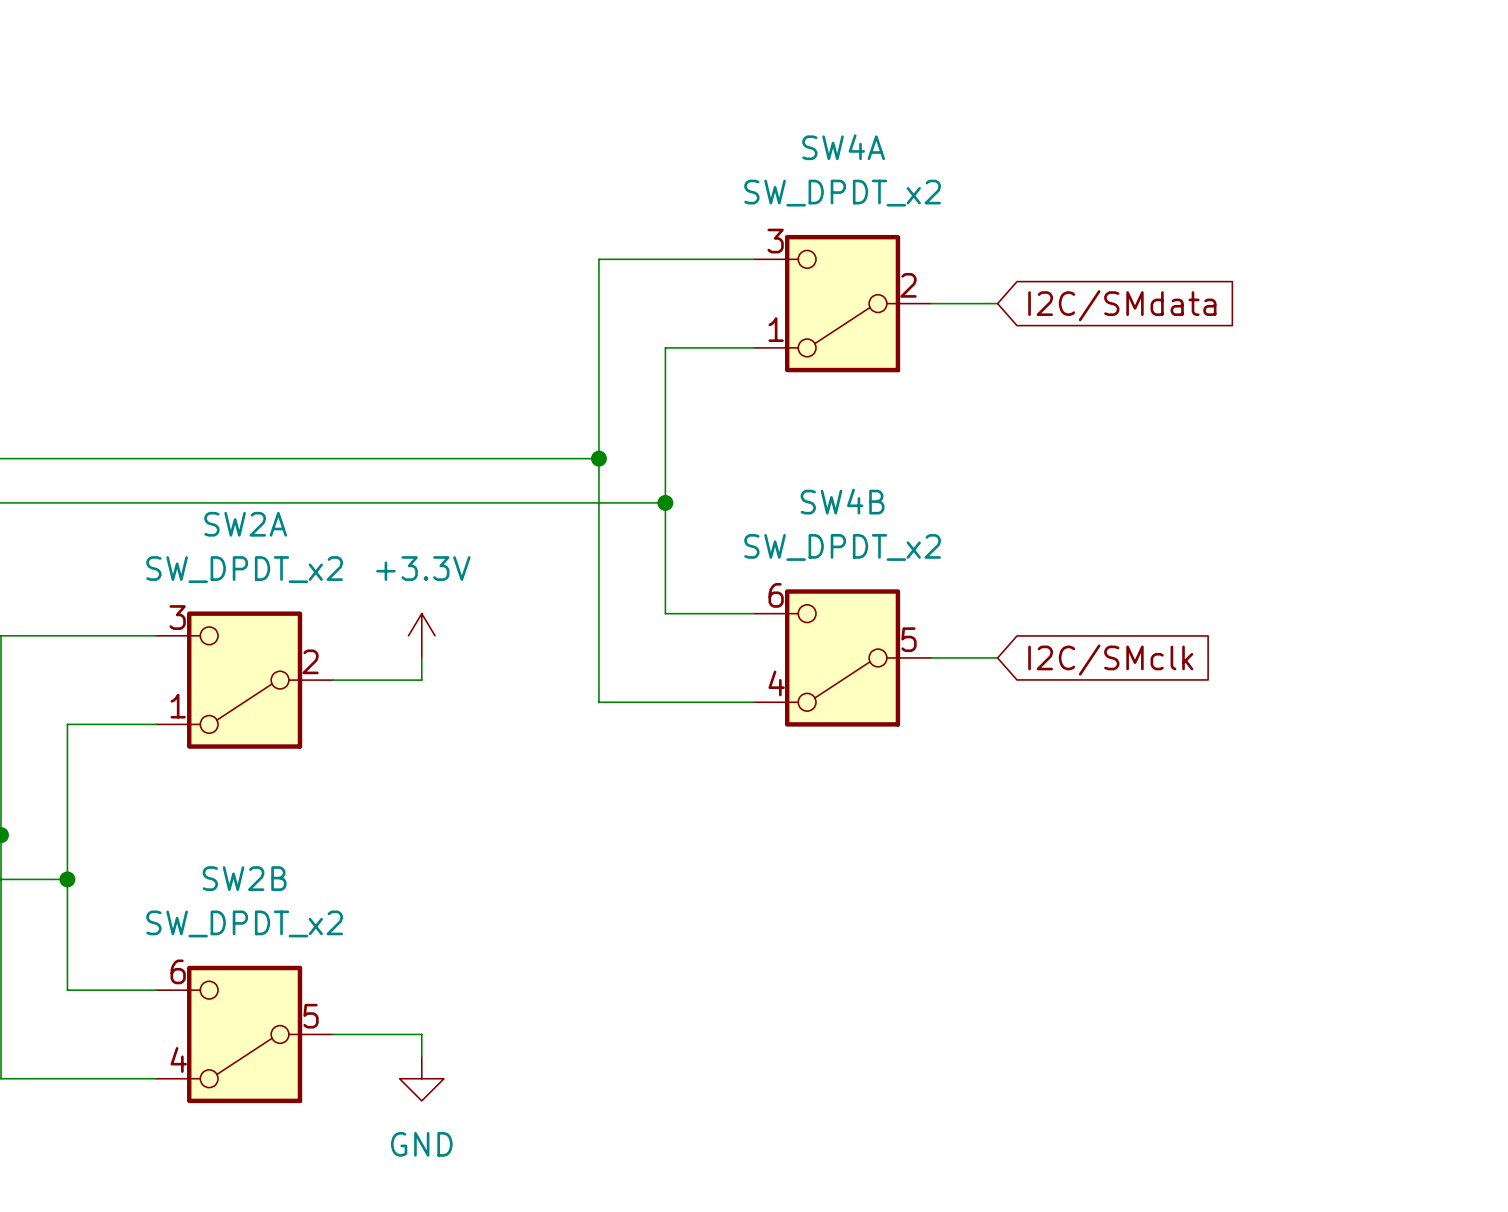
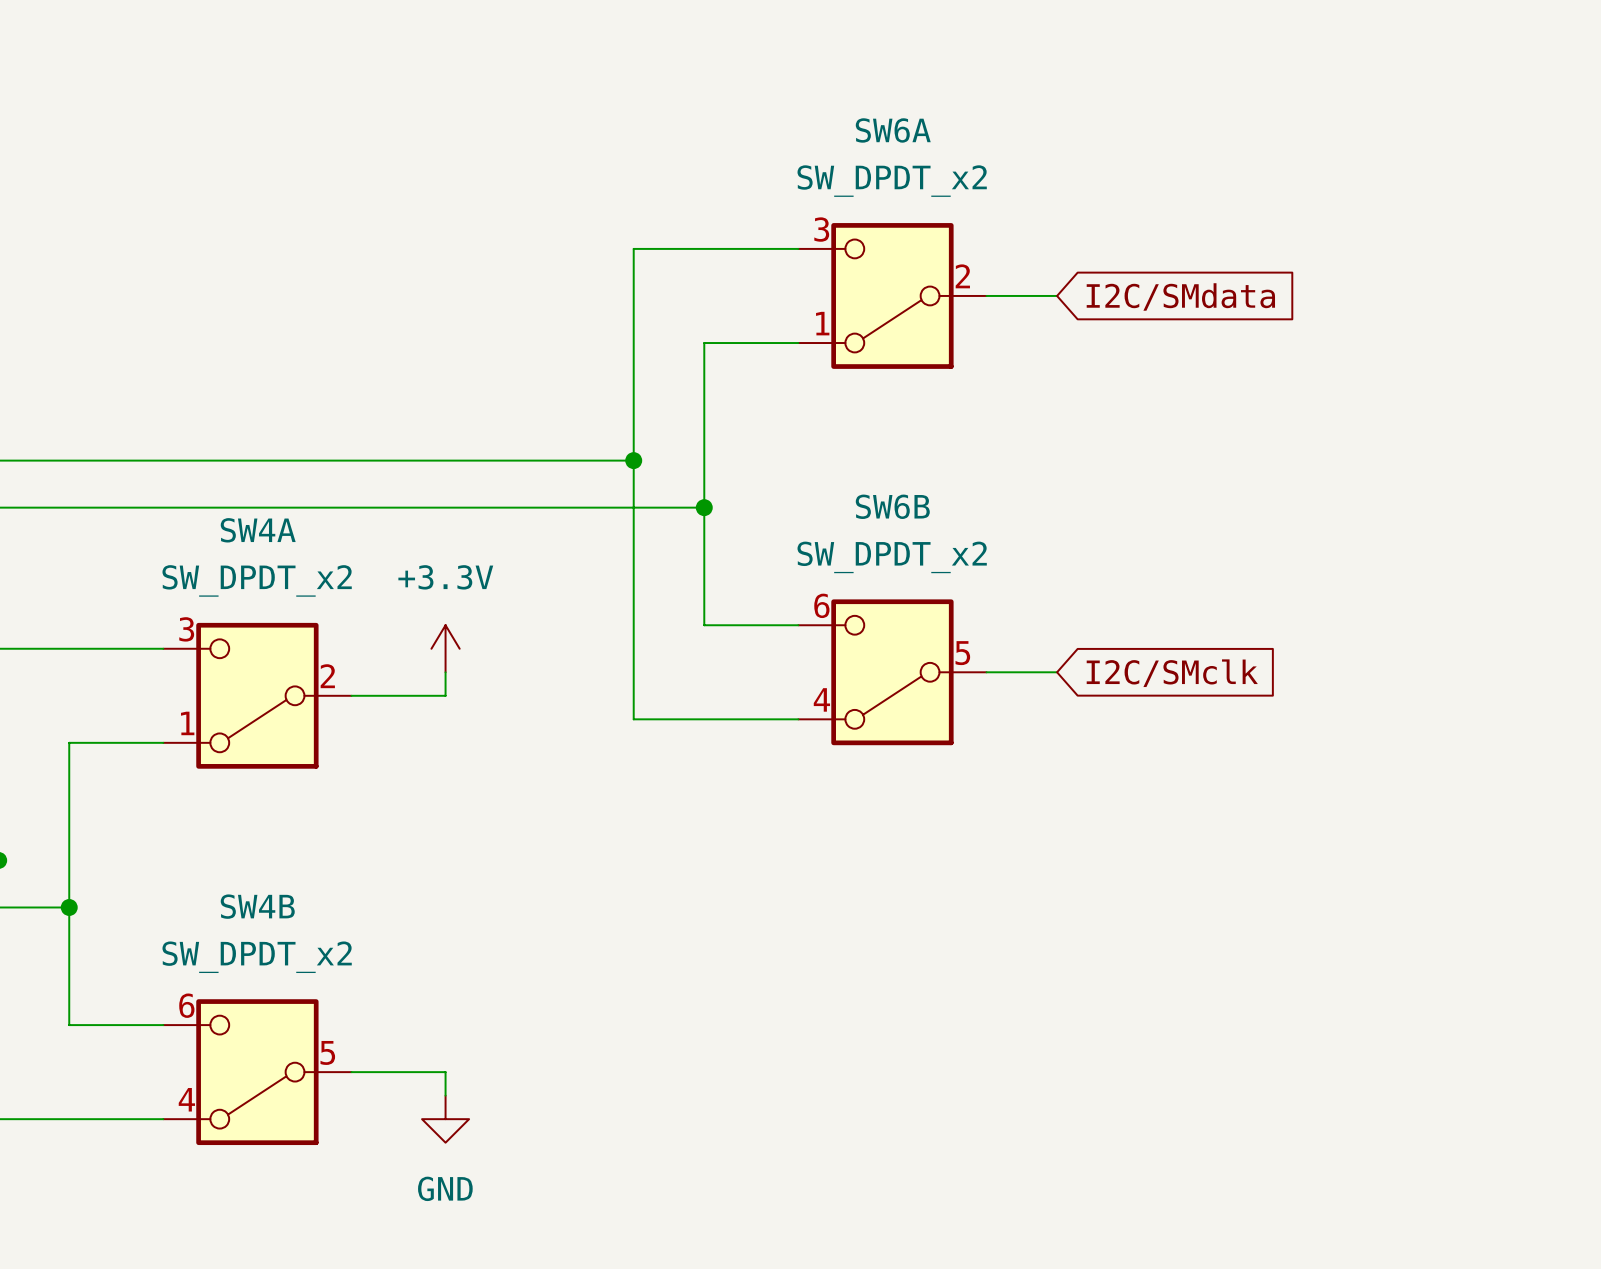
SW4A name: SW4A (843, 147) -> SW6A (893, 130)
SW4B name: SW4B (842, 501) -> SW6B (892, 506)
SW2A name: SW2A (245, 524) -> SW4A (258, 530)
SW2B name: SW2B (244, 878) -> SW4B (257, 906)

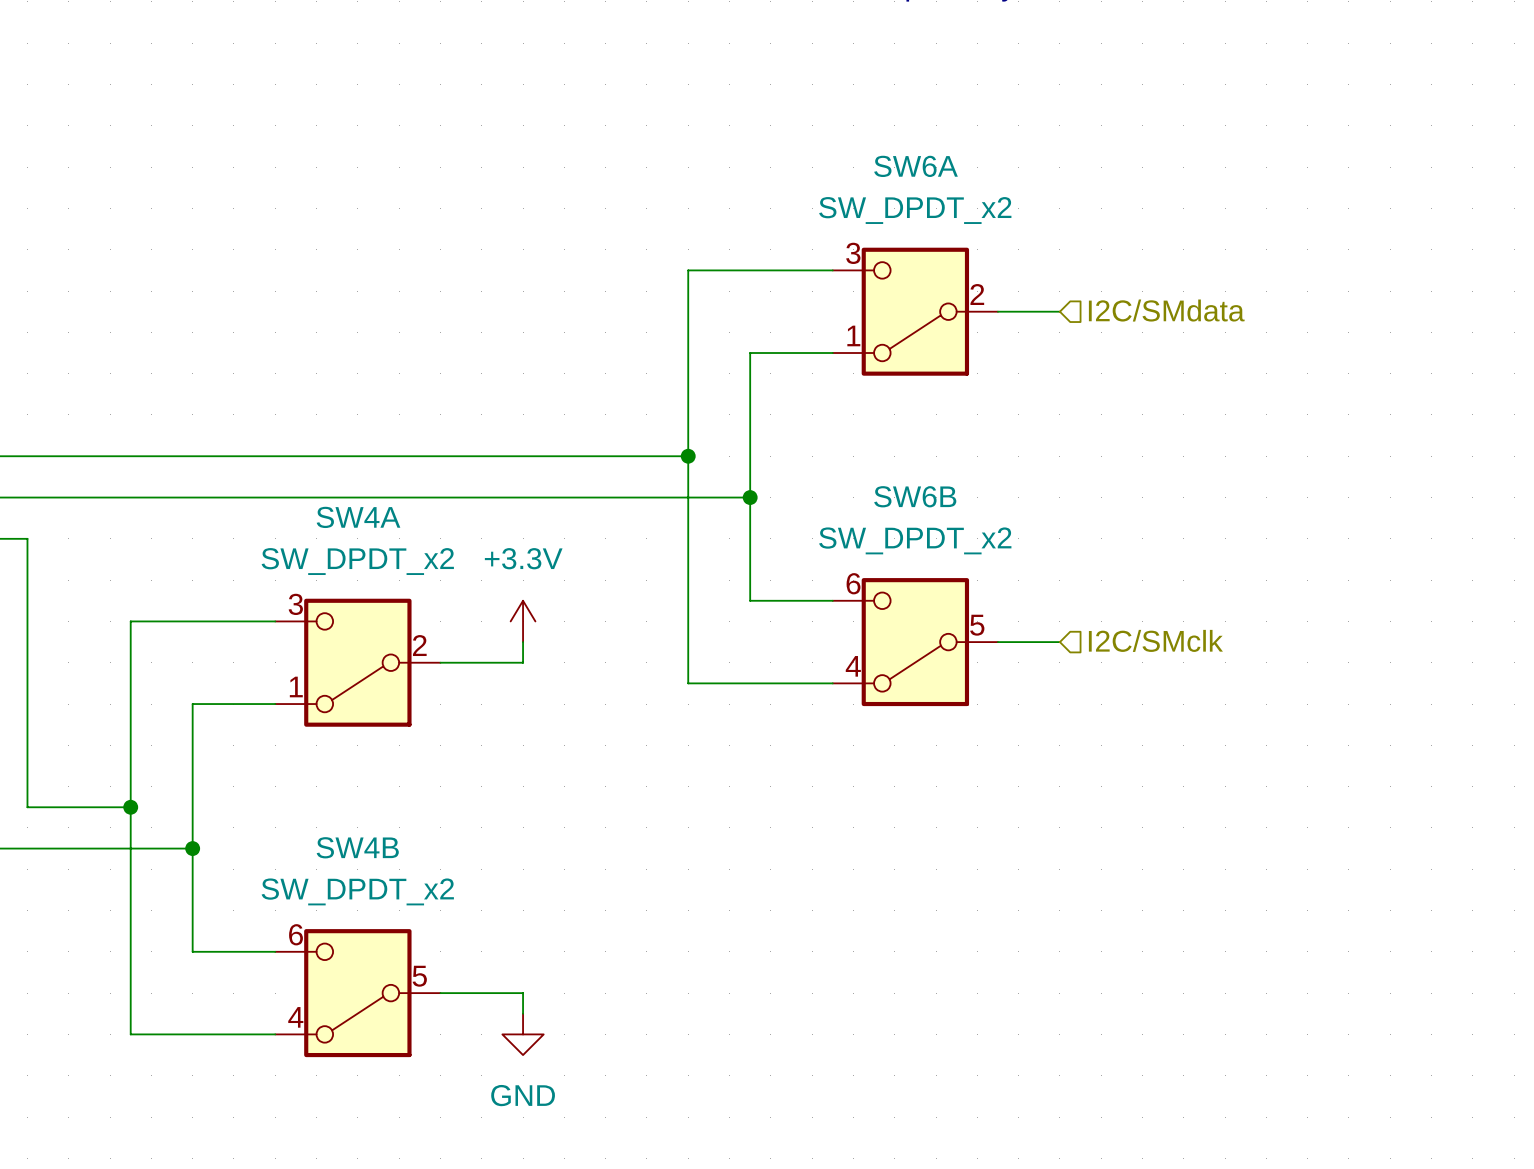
global label: I2C/SMdata (1180, 296) -> none
hierarchical label: none -> I2C/SMdata (1166, 310)
hierarchical label: none -> I2C/SMclk (1155, 640)
global label: I2C/SMclk (1172, 673) -> none

